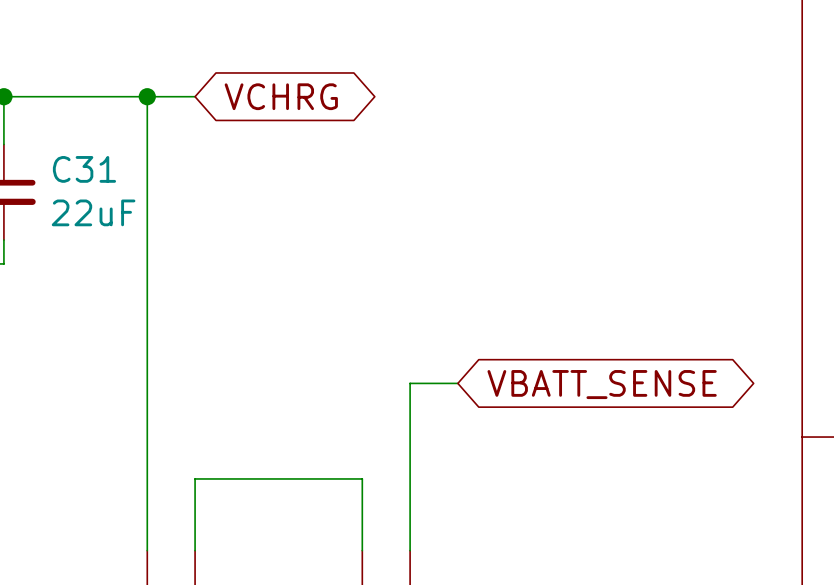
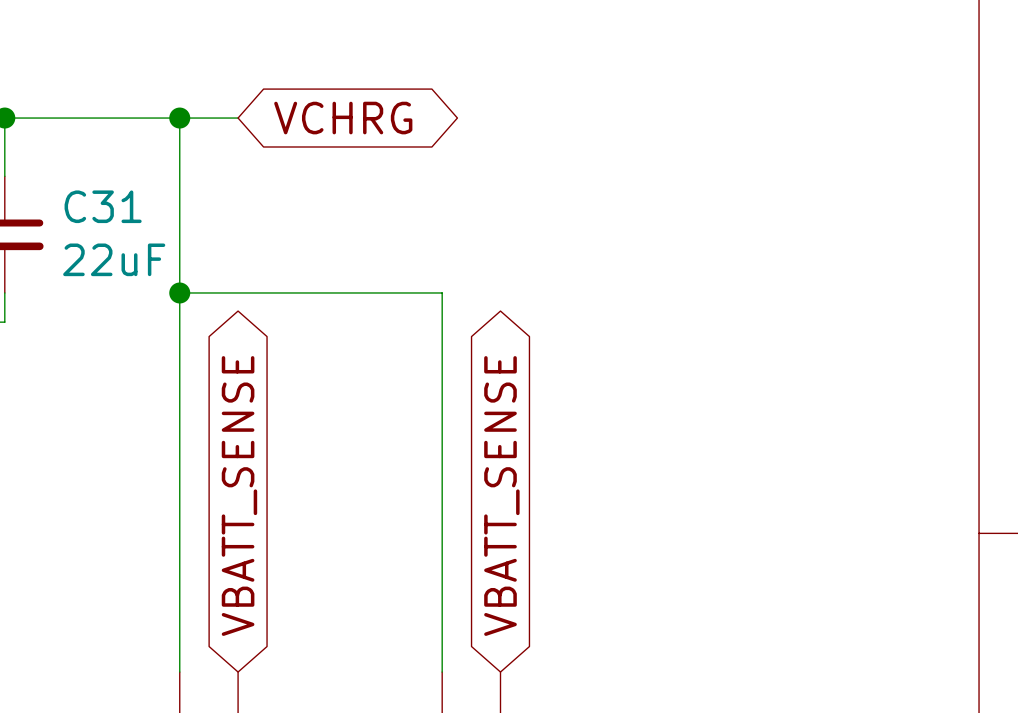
junction: none -> (179, 292)
wire: (457, 383) (410, 383) (410, 550) -> none
global label: VBATT_SENSE (602, 384) -> none
global label: none -> VBATT_SENSE (239, 496)
global label: none -> VBATT_SENSE (501, 496)
wire: (362, 478) (195, 478) (195, 550) -> (442, 584) (442, 292) (179, 292)

